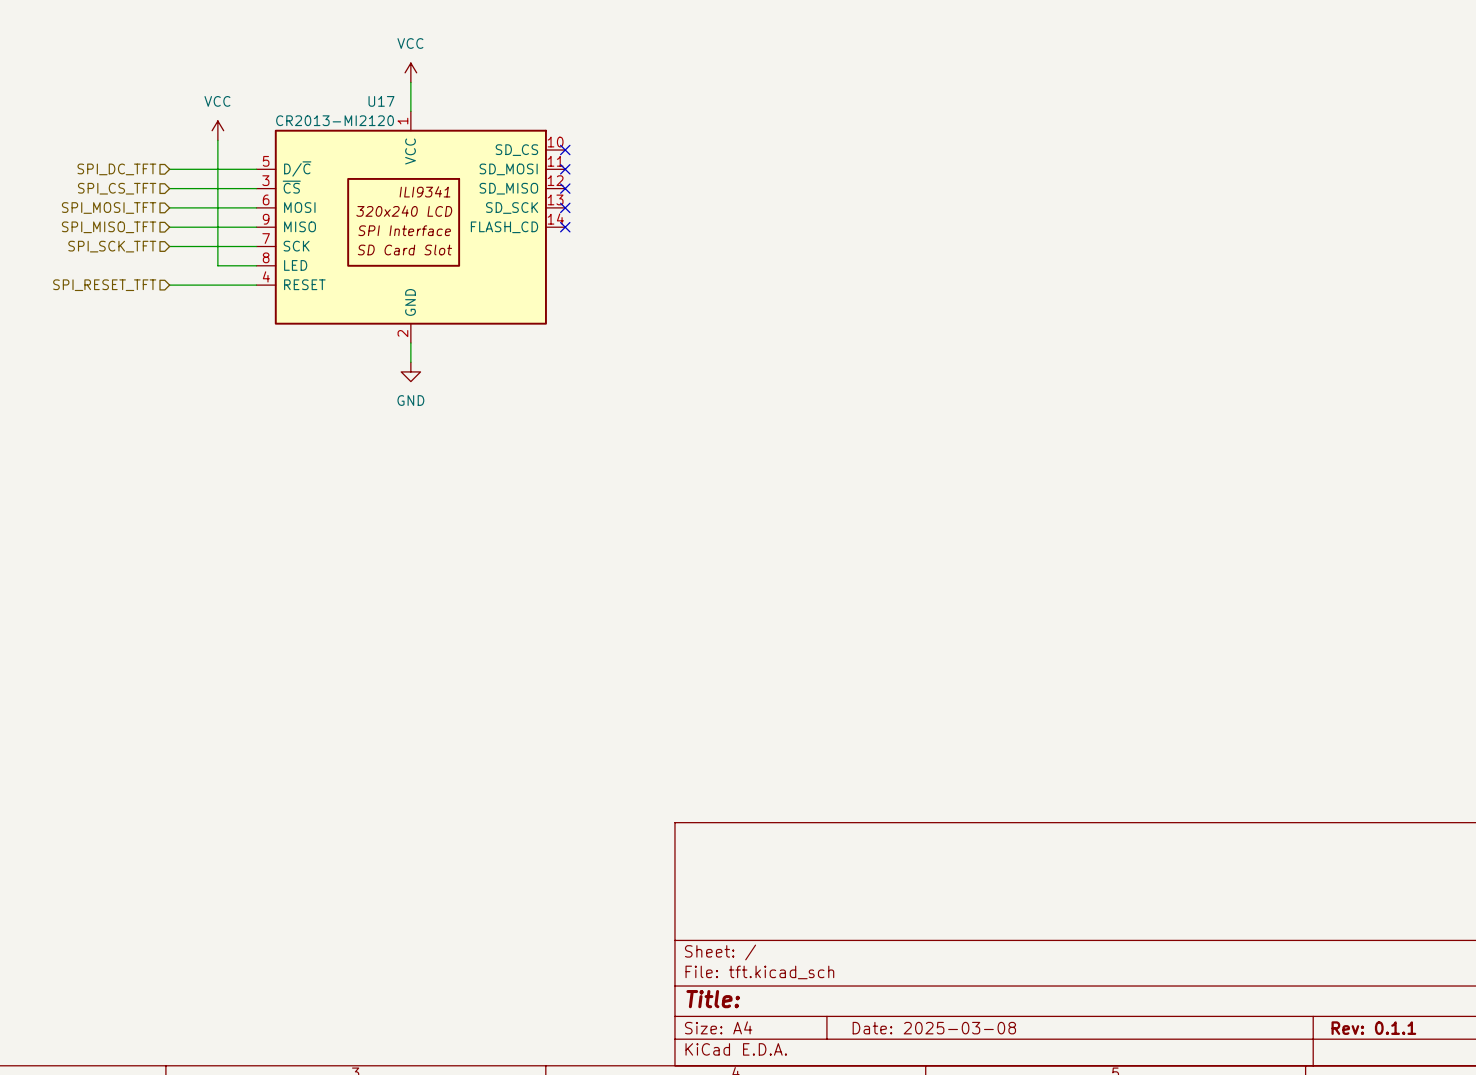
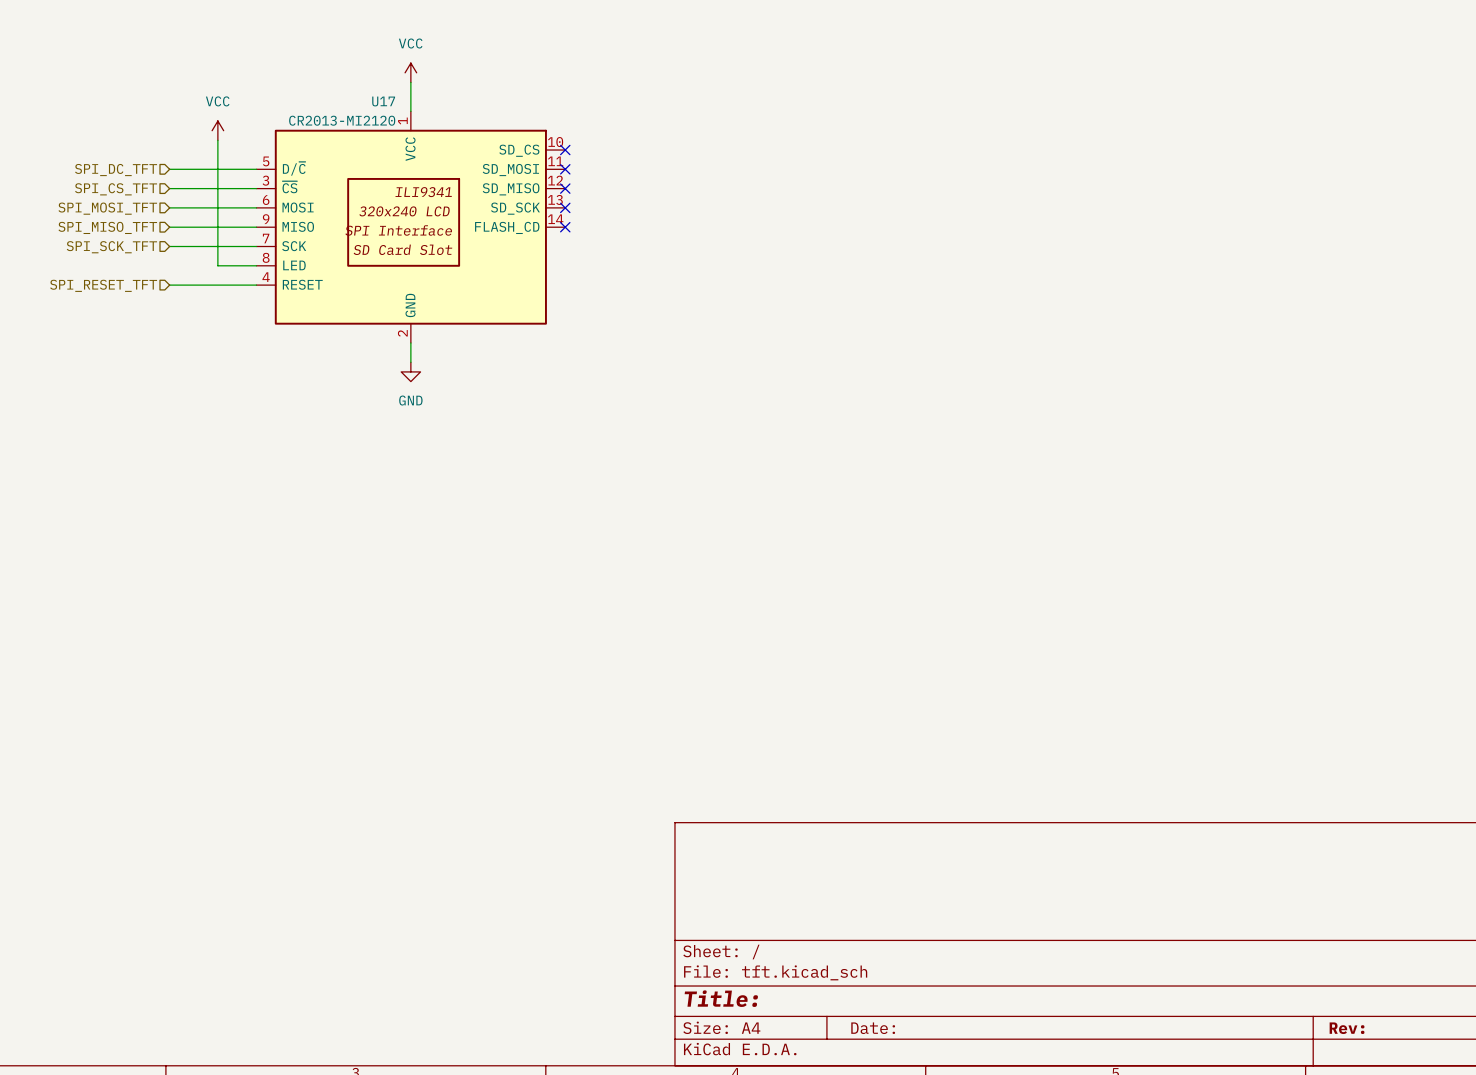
title block: Date: 2025-03-08 (934, 1028) -> Date: (873, 1028)
title block: Rev: 0.1.1 (1373, 1028) -> Rev: (1347, 1028)

